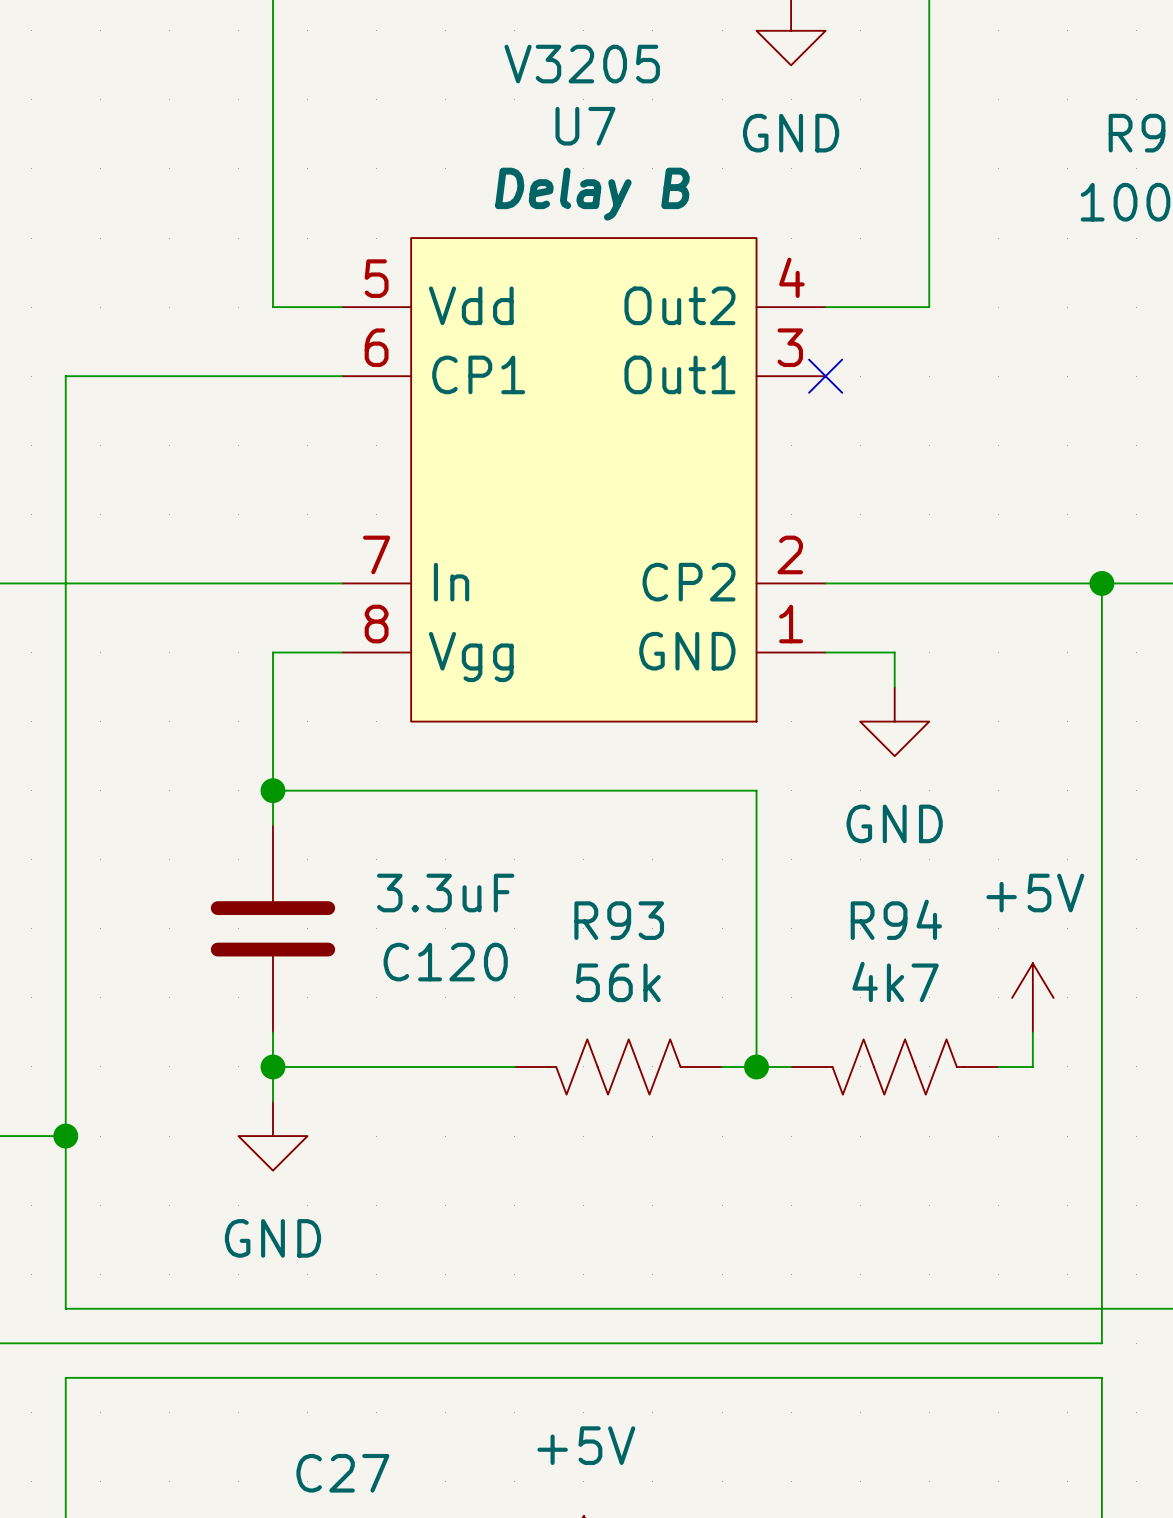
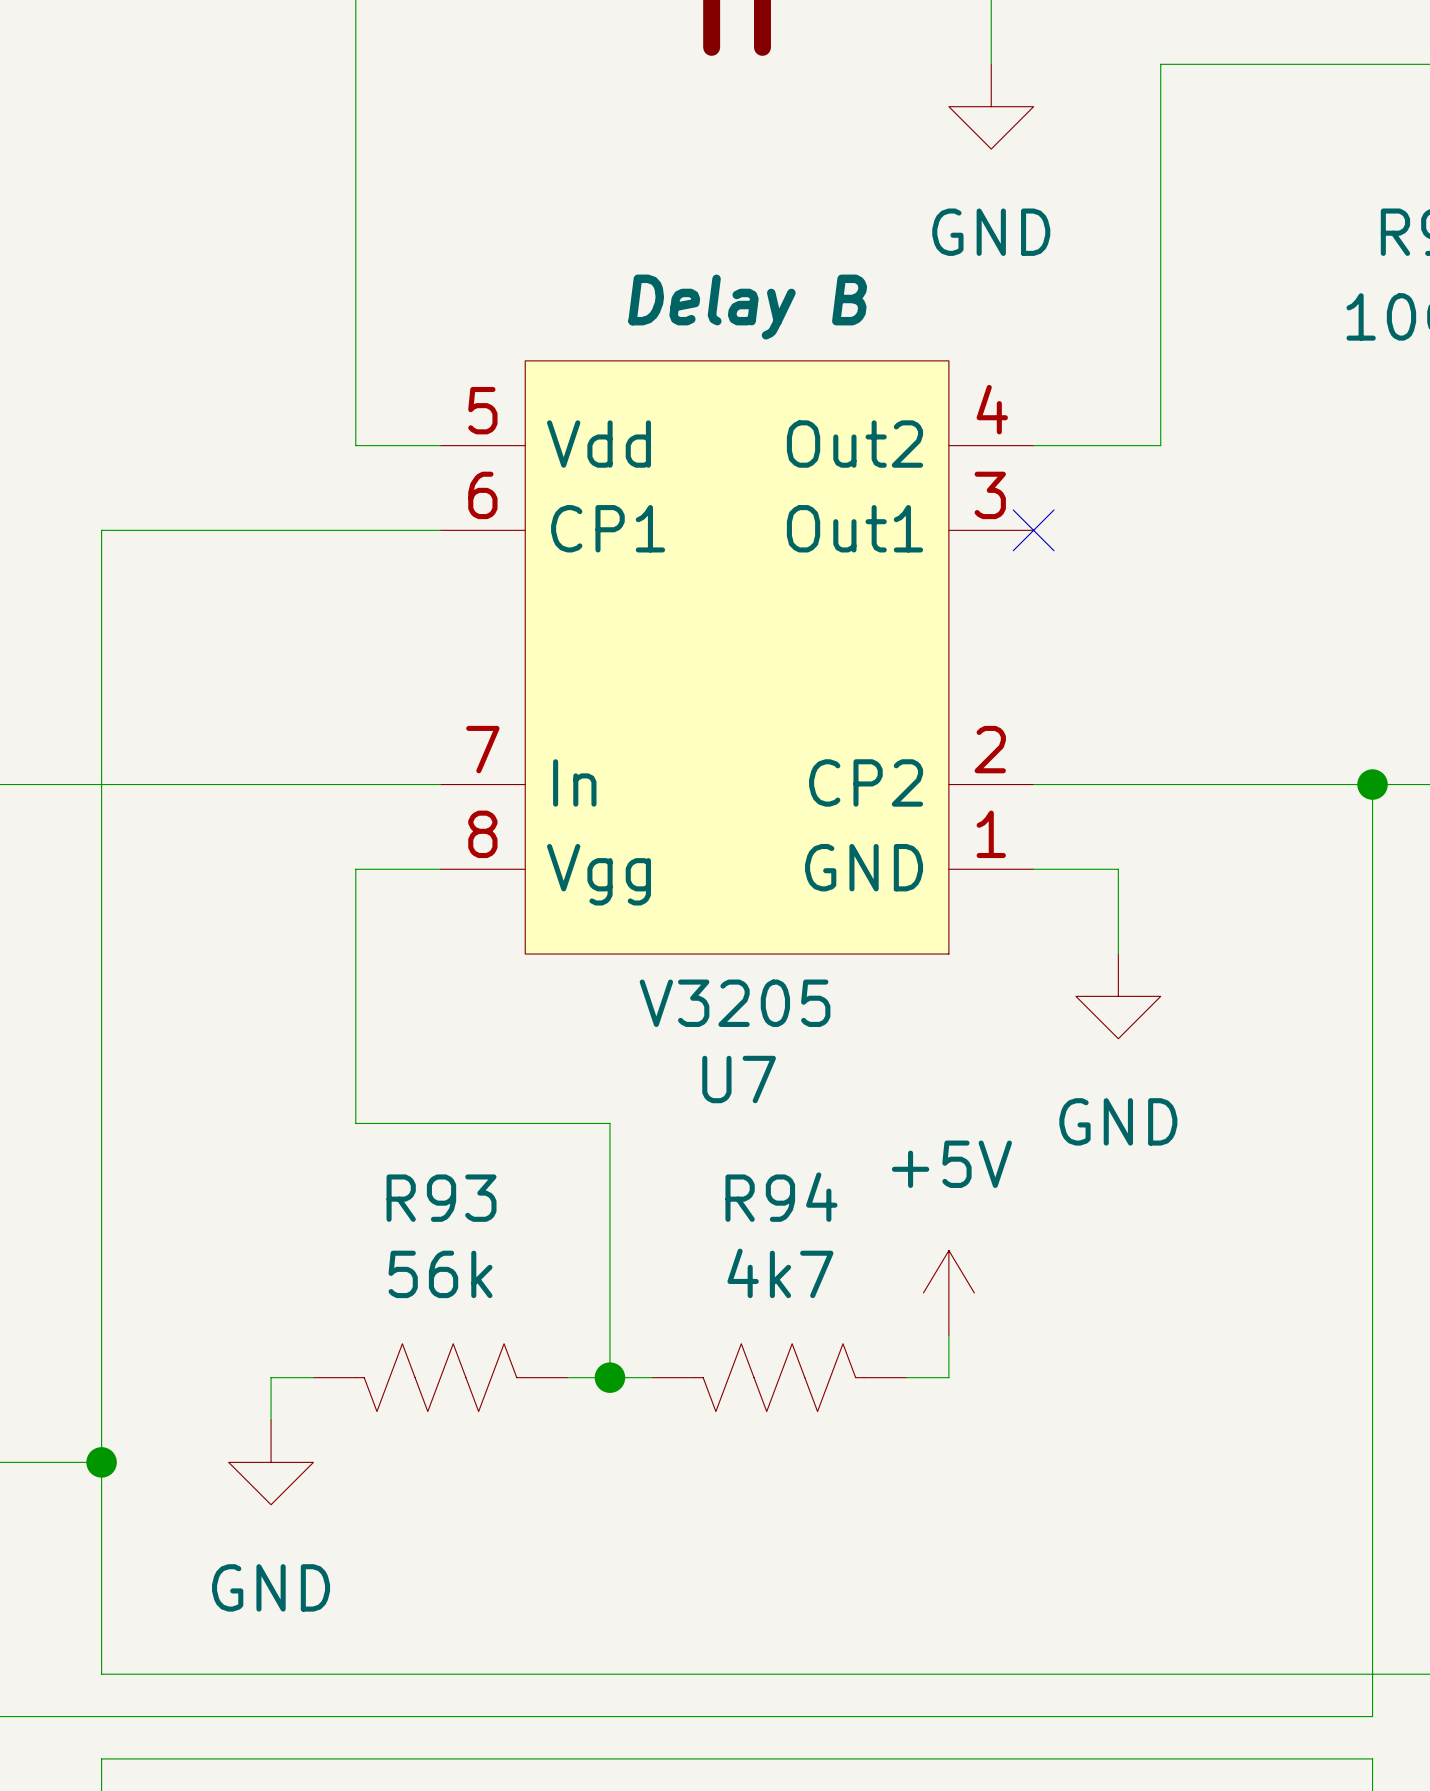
U7 value position: V3205 (582, 64) -> V3205 (735, 1003)
U7 name position: U7 (585, 126) -> U7 (739, 1079)
power symbol position: GND (894, 721) -> GND (1118, 996)
wire: (272, 790) (756, 790) (756, 1032) -> none
junction: (272, 790) -> none
wire: none -> (355, 1081) (355, 1123) (609, 1123) (609, 1377)
R93 name: R93 (619, 920) -> R94 (781, 1197)
C120: 3.3uF (272, 928) -> none
R93 value: 56k (618, 982) -> 4k7 (780, 1273)
power symbol position: +5V (1032, 997) -> +5V (948, 1292)
wire: (272, 1032) (272, 1101) -> none
wire: (1032, 1032) (1032, 1066) (998, 1066) -> none
wire: none -> (313, 1377) (271, 1377) (271, 1420)
wire: (272, 1066) (445, 1066) -> none
junction: (272, 1066) -> none
R93: none -> 56k (440, 1377)
junction: none -> (609, 1377)
wire: (756, 1066) (791, 1066) -> none
junction: (756, 1066) -> none
R94: 4k7 (894, 1066) -> none
power symbol position: GND (272, 1136) -> GND (271, 1462)

